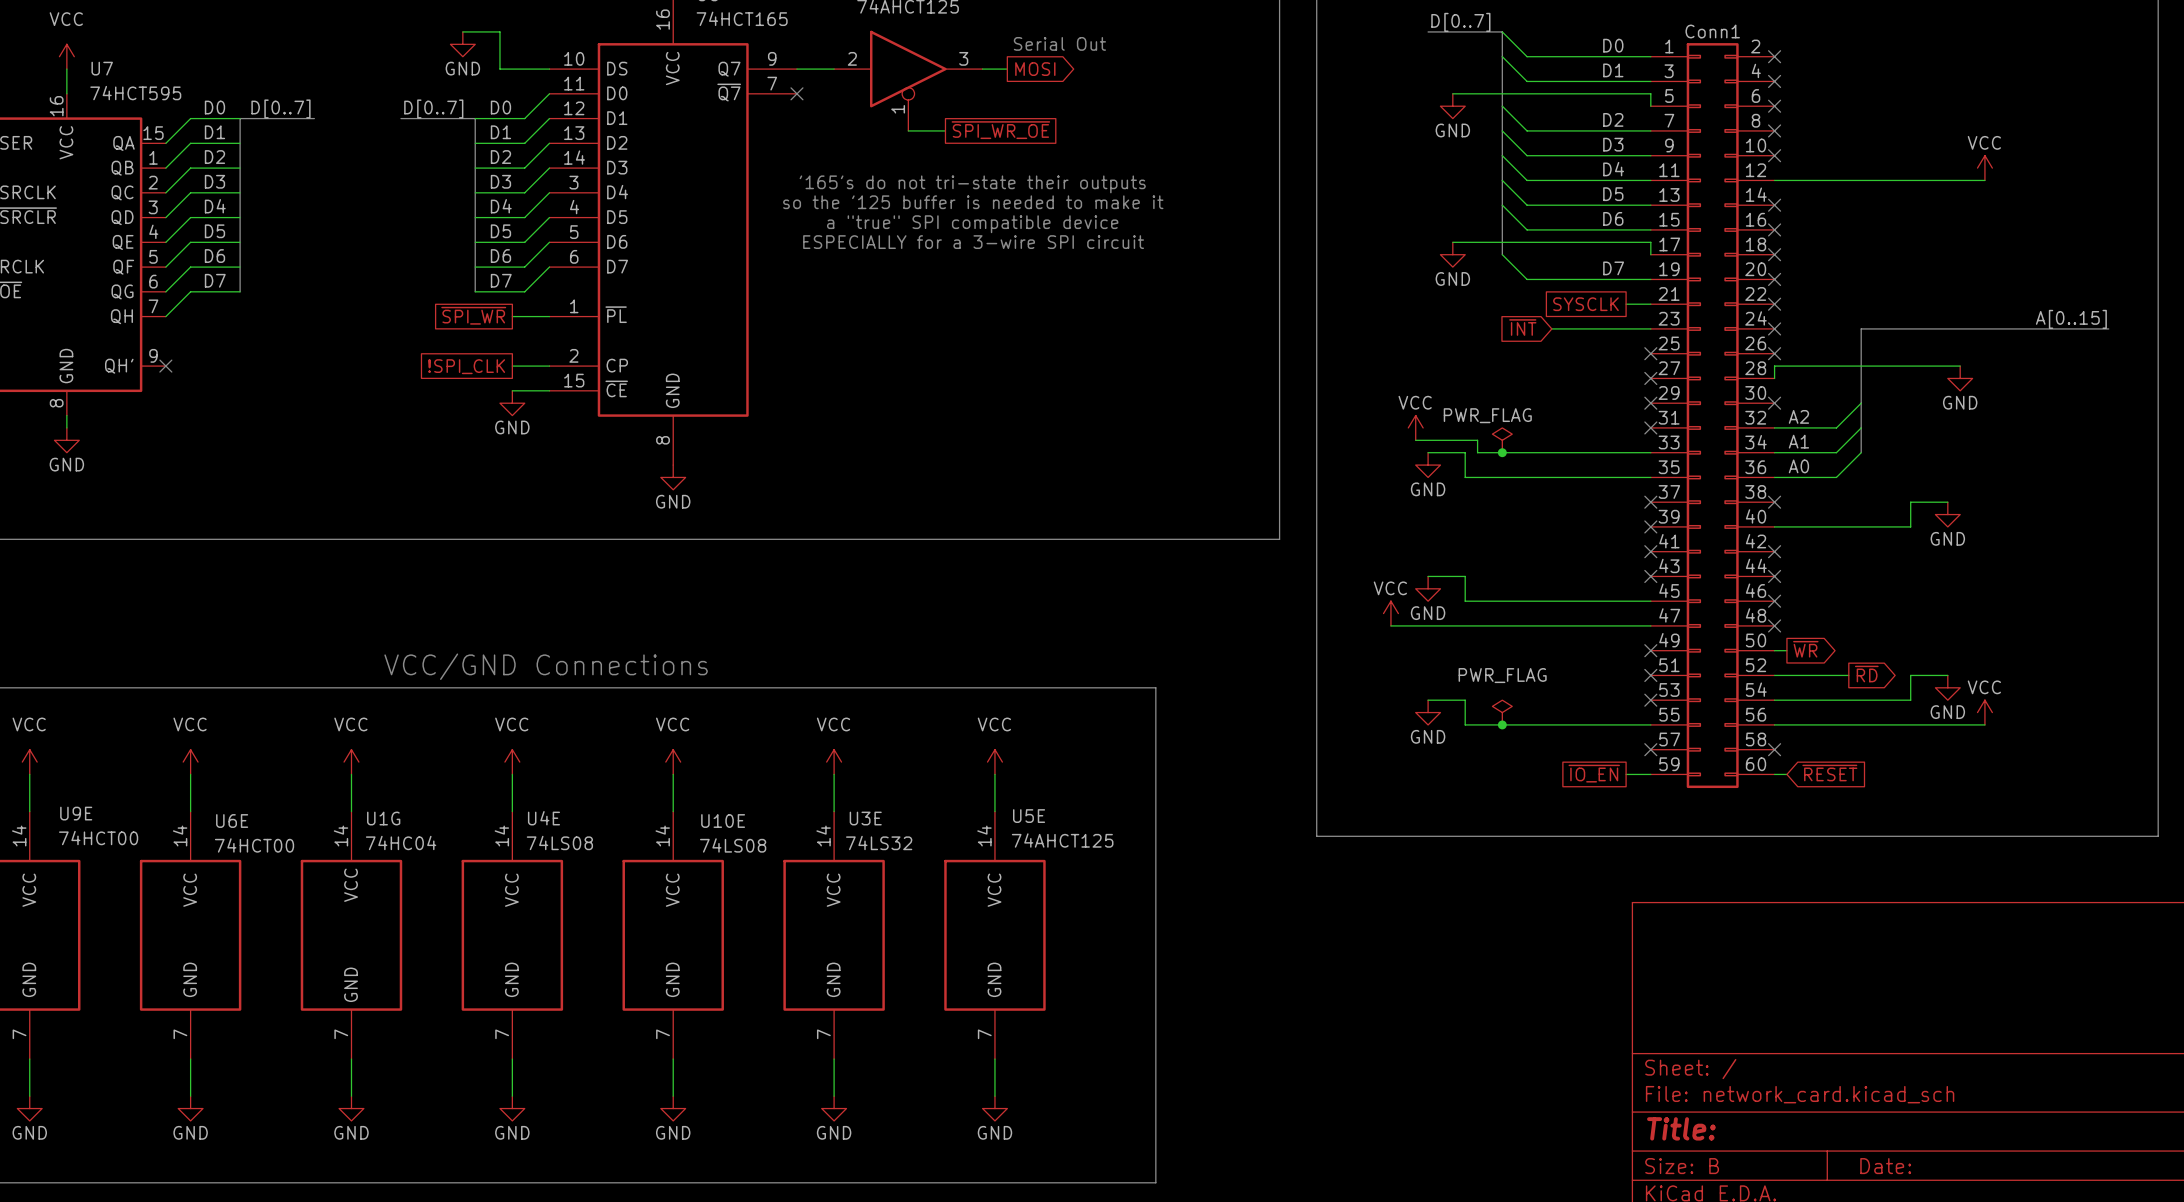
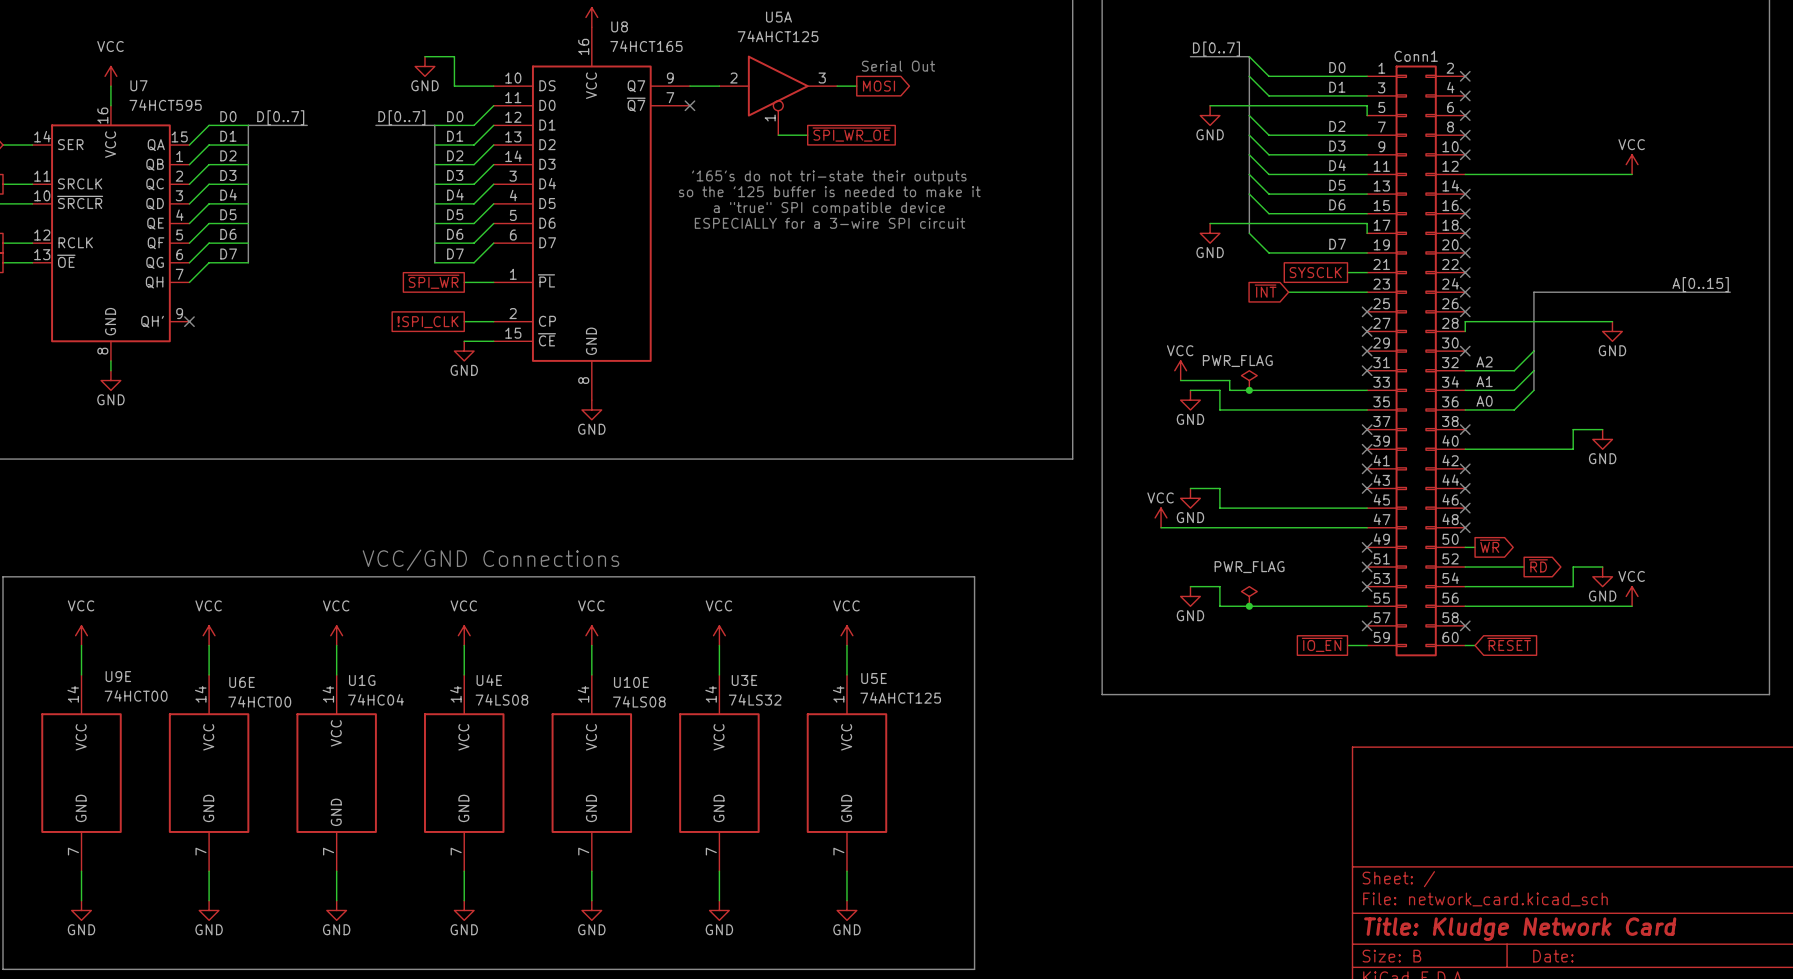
title block: Title: (1681, 1128) -> Title: Kludge Network Card (1520, 929)

